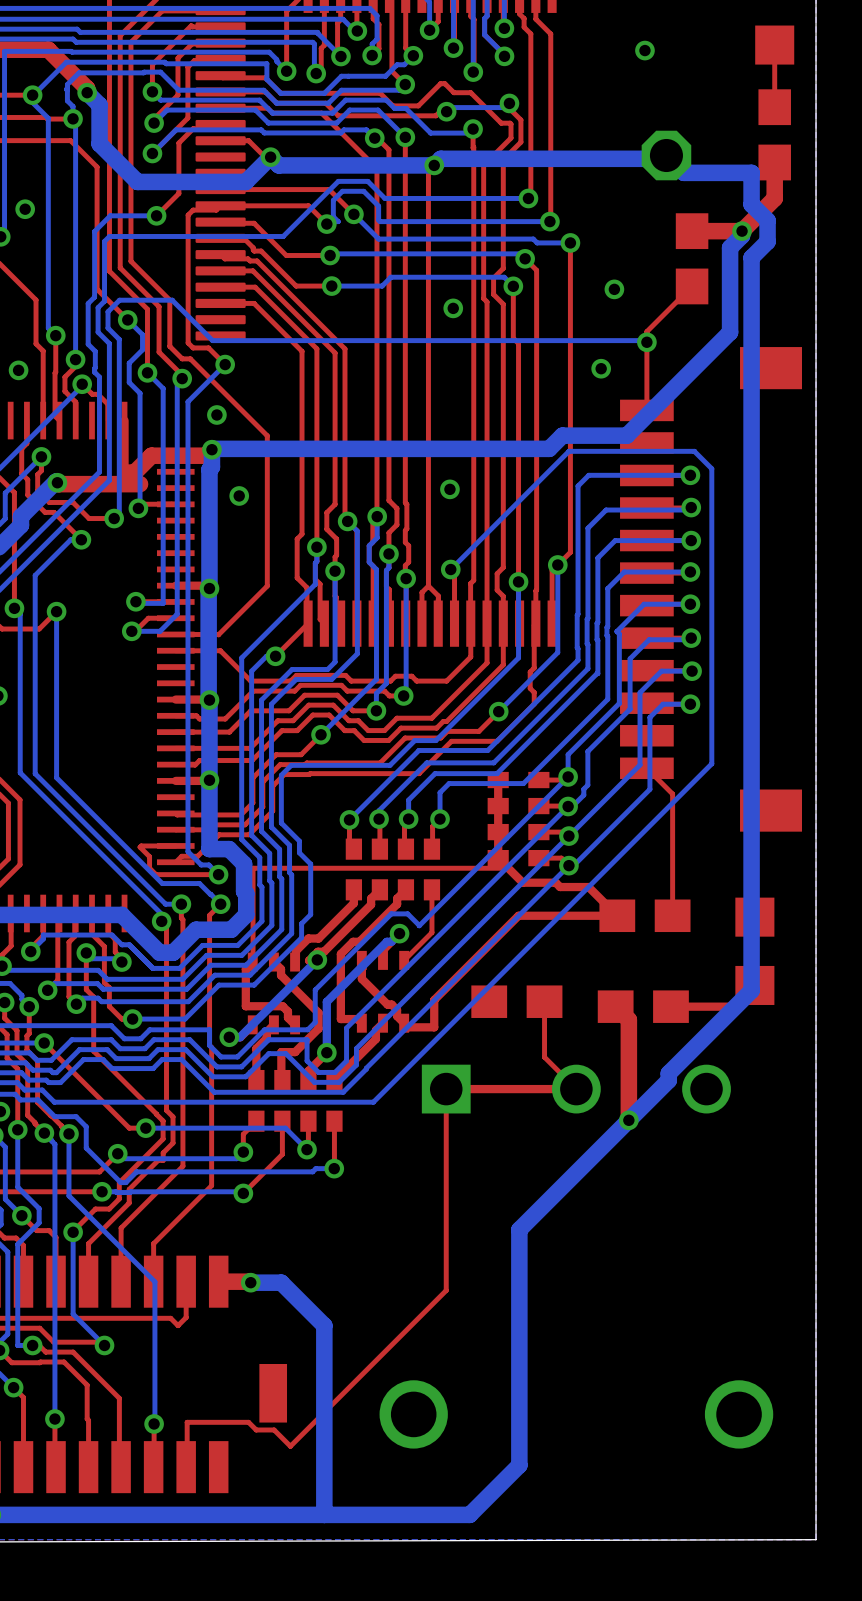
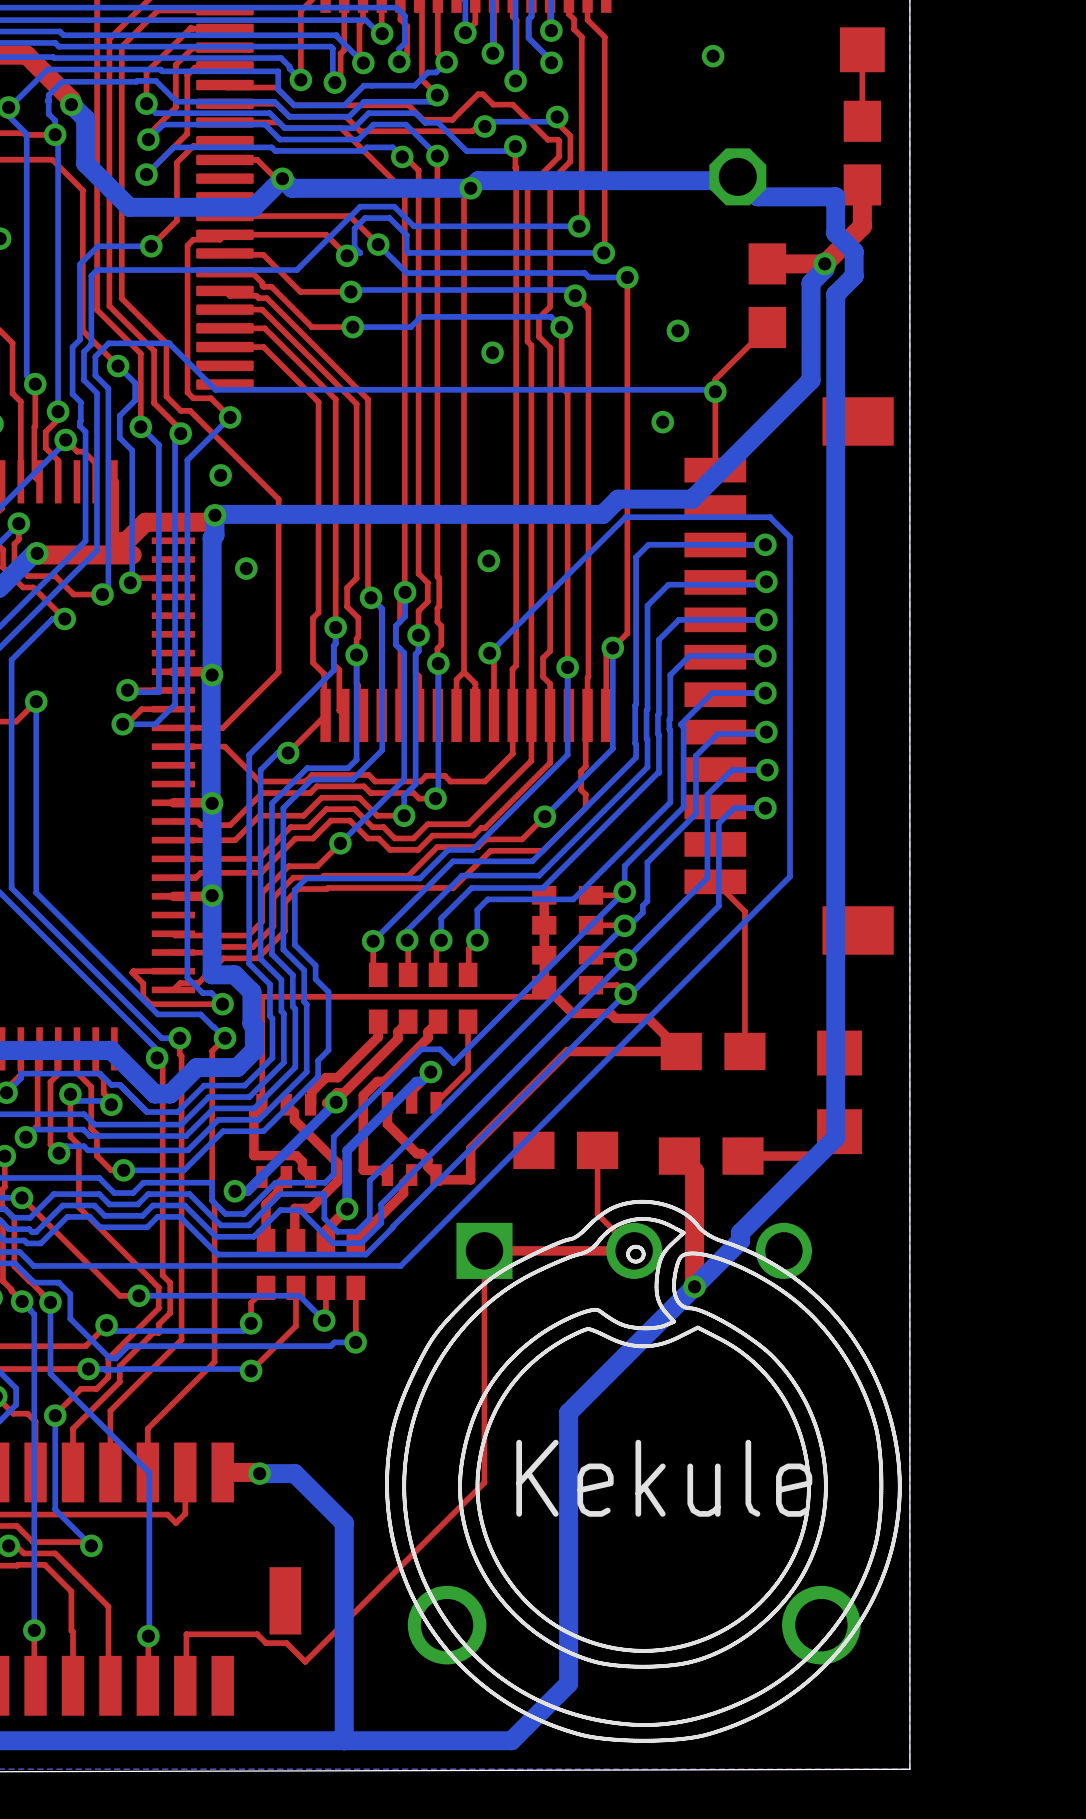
drawing: none -> [385, 1199, 902, 1743]

